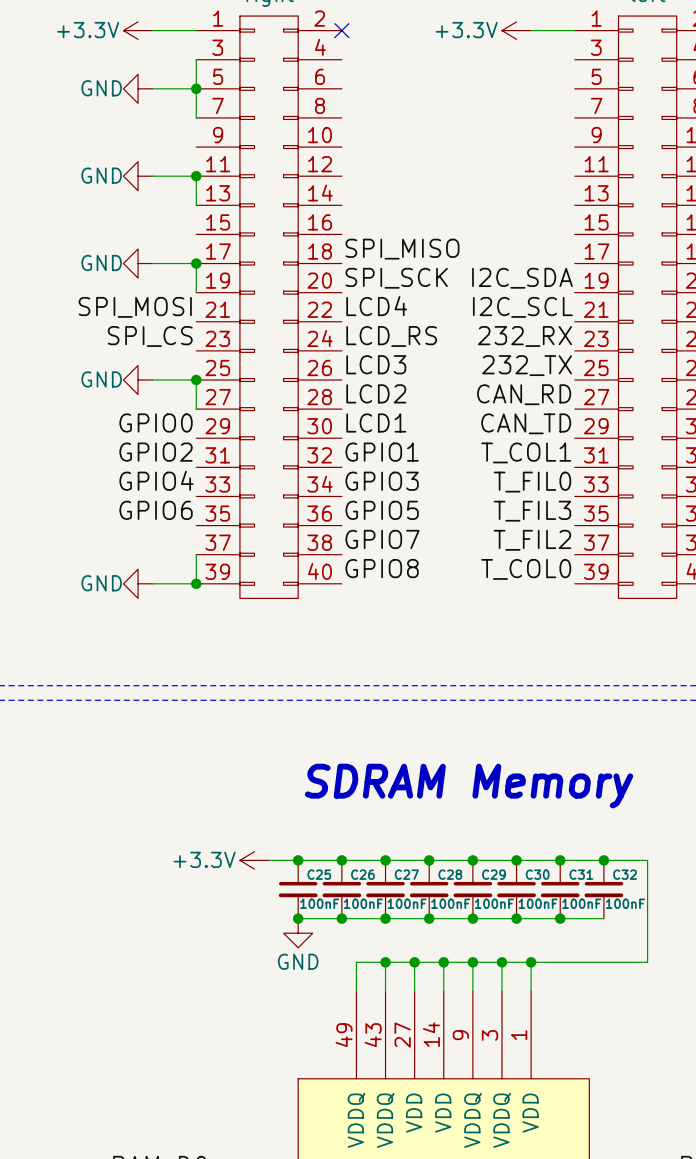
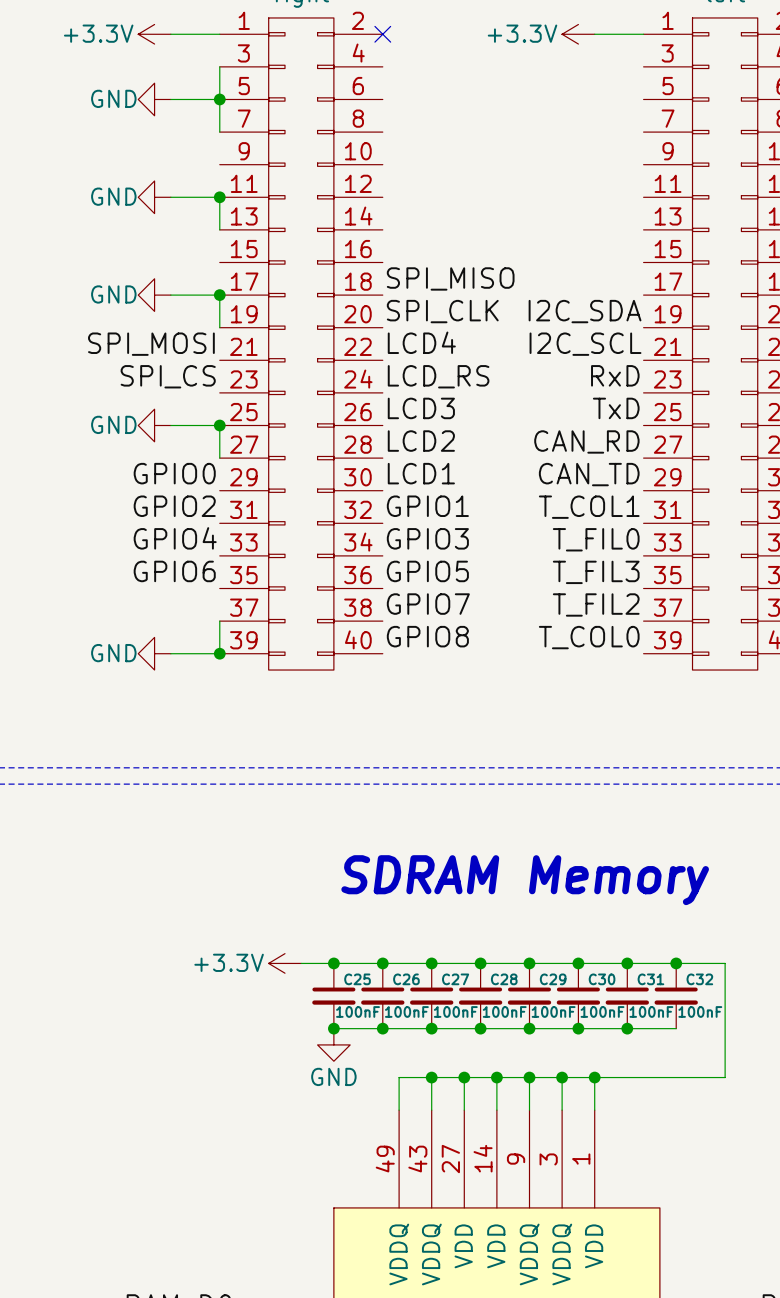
label: SPI_SCK (396, 278) -> SPI_CLK (442, 311)
label: 232_RX (524, 336) -> RxD (615, 375)
label: 232_TX (527, 365) -> TxD (616, 408)

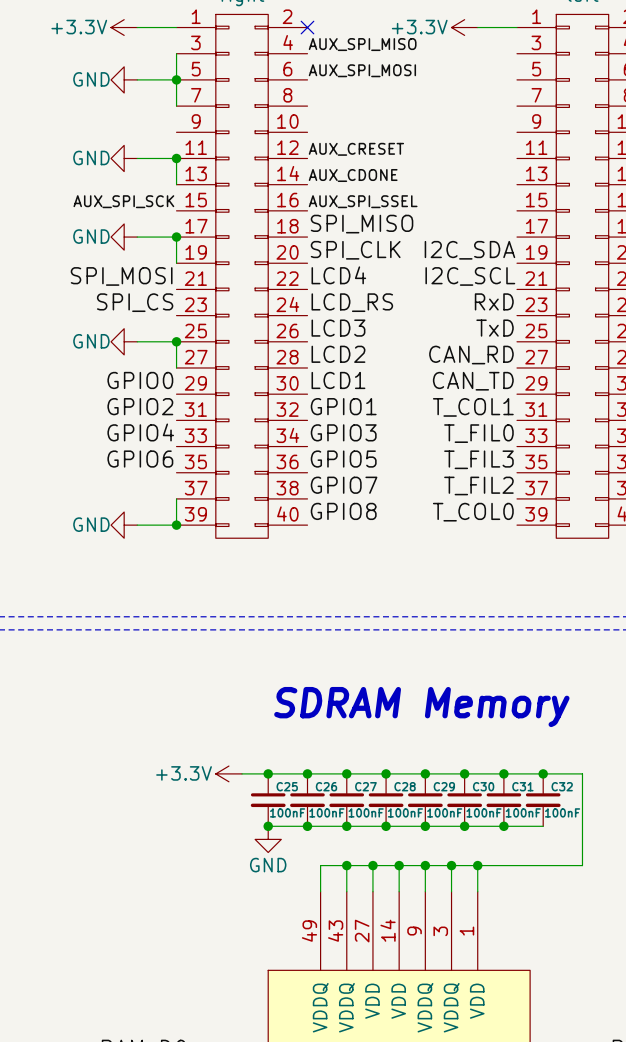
label: none -> AUX_SPI_MISO (362, 44)
label: none -> AUX_SPI_MOSI (362, 70)
label: none -> AUX_CRESET (356, 149)
label: none -> AUX_CDONE (353, 175)
label: none -> AUX_SPI_SCK (123, 201)
label: none -> AUX_SPI_SSEL (363, 201)

